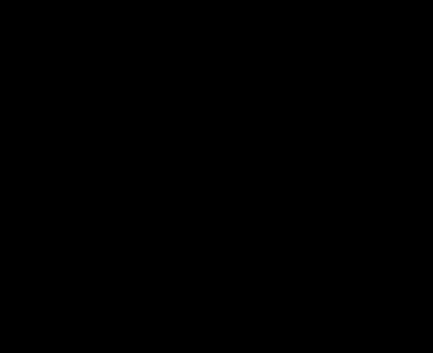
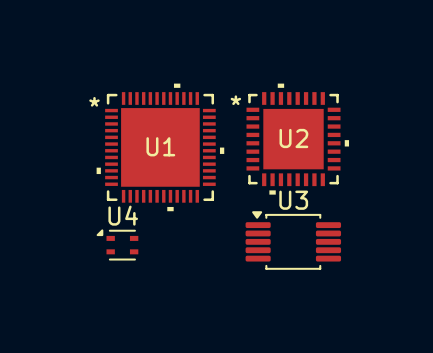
U2: none -> (297, 139)
U1: none -> (160, 147)
U3: none -> (293, 240)
U4: none -> (117, 244)

